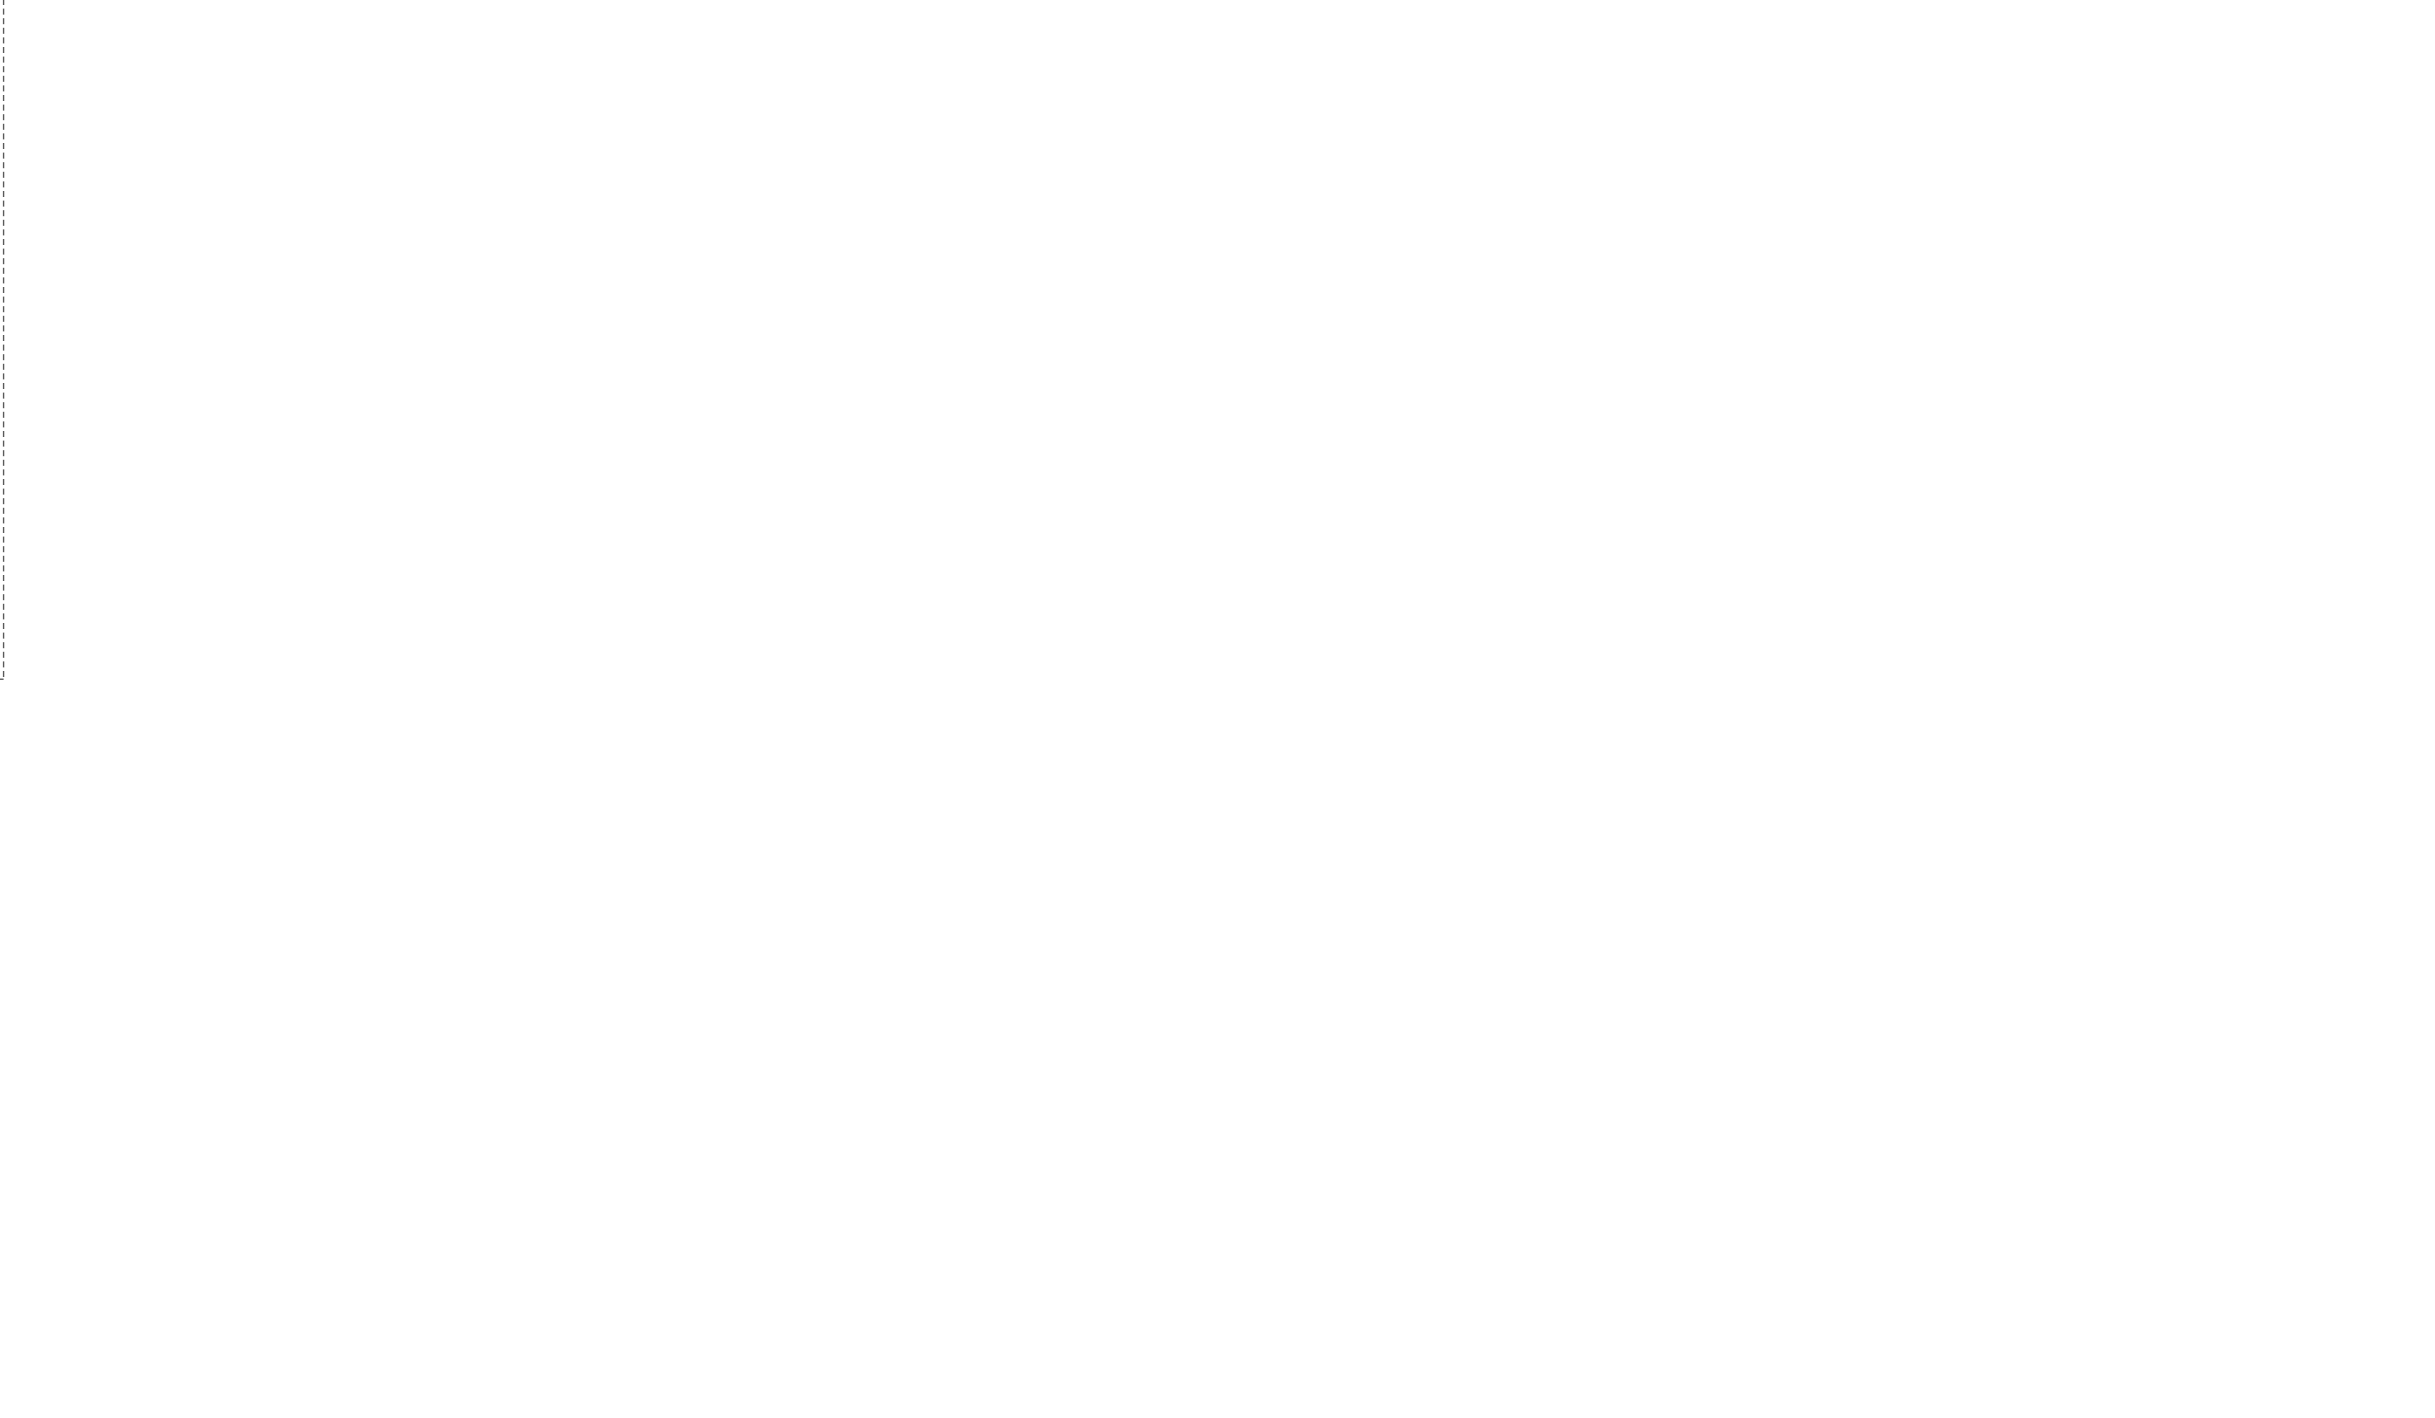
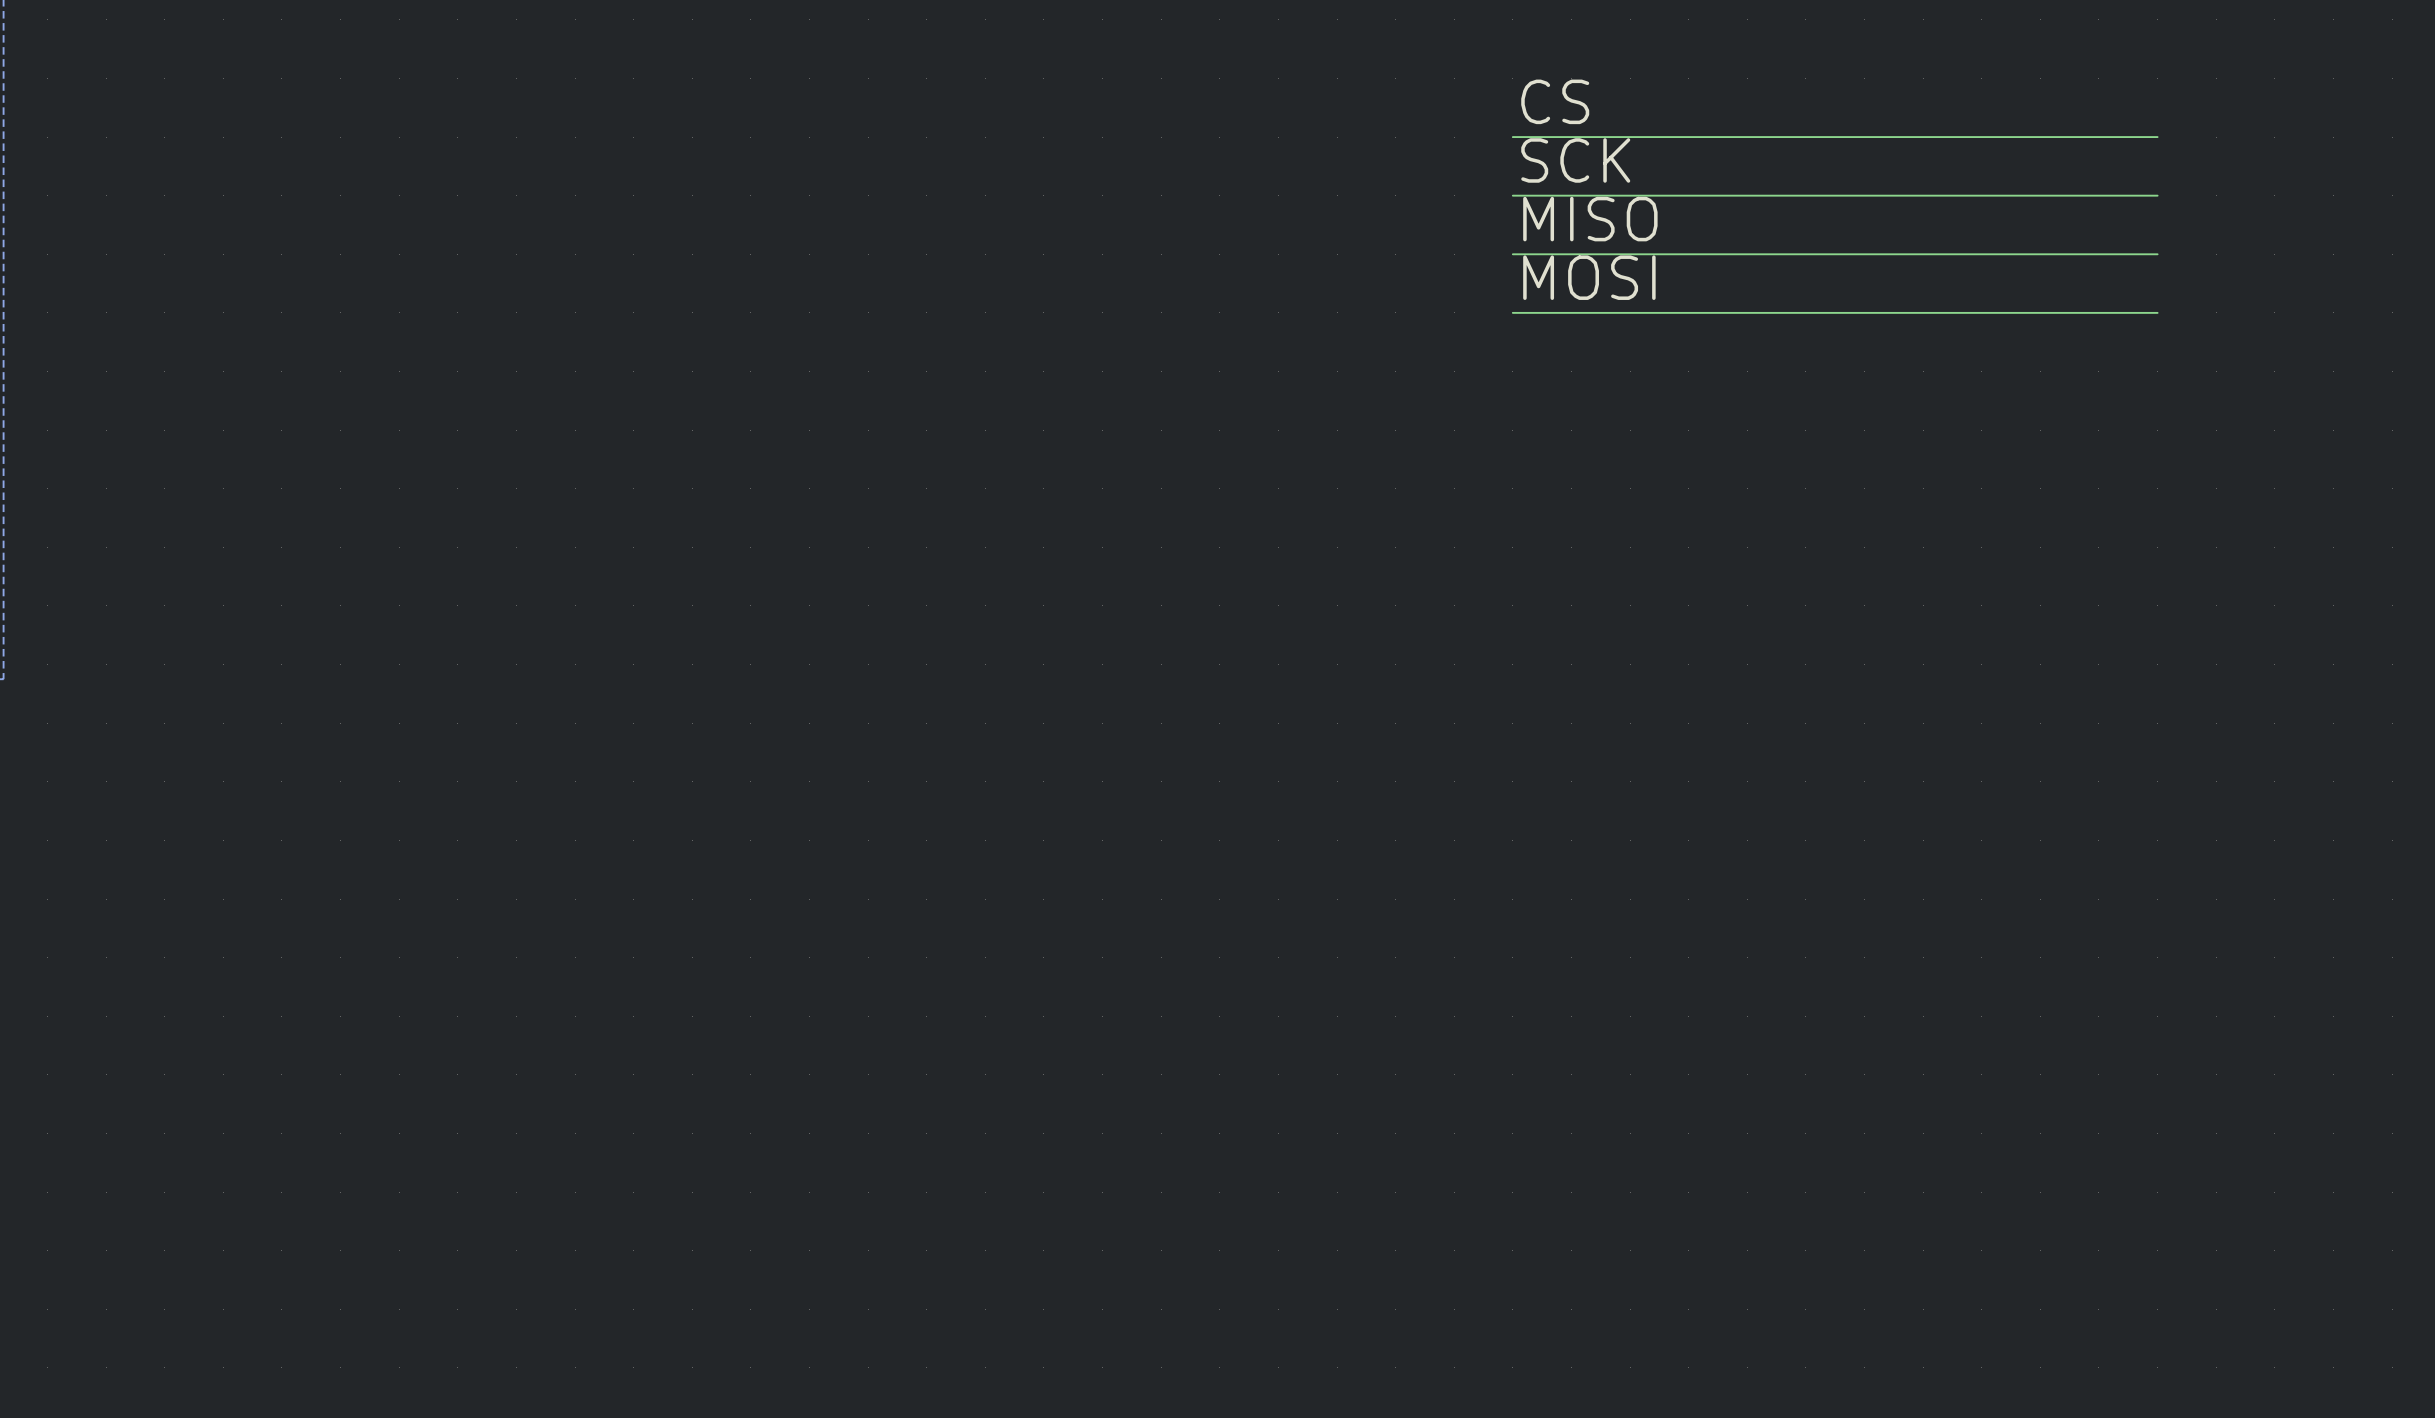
label: none -> CS (1555, 101)
wire: none -> (1512, 137) (2157, 137)
label: none -> SCK (1575, 160)
wire: none -> (1512, 195) (2157, 195)
label: none -> MISO (1590, 219)
wire: none -> (1512, 254) (2157, 254)
label: none -> MOSI (1589, 277)
wire: none -> (1512, 312) (2157, 312)

